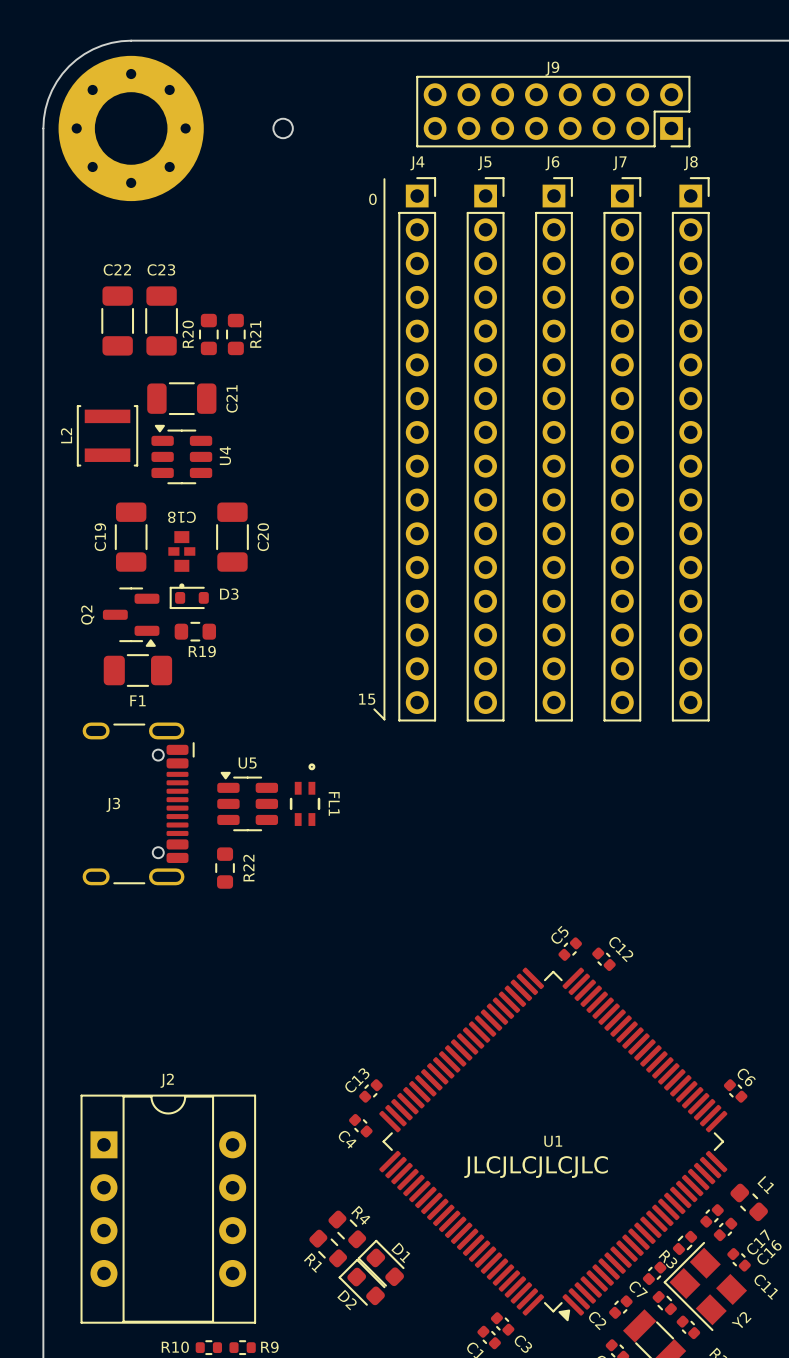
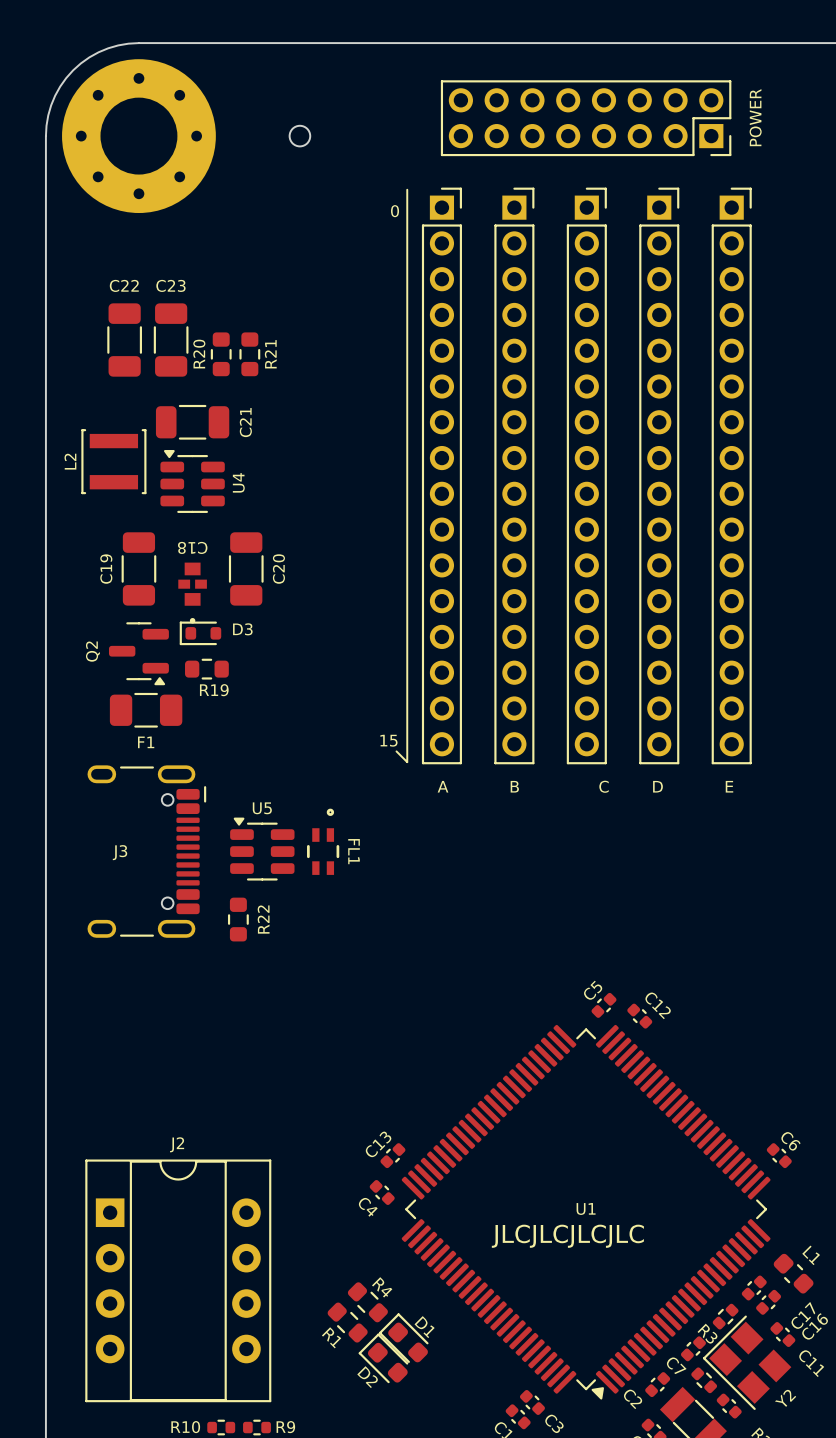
J9 name: J9 (552, 68) -> POWER (755, 117)
J4 name: J4 (417, 163) -> A (443, 786)
J5 name: J5 (484, 163) -> B (514, 786)
J6 name: J6 (552, 163) -> C (604, 786)
J7 name: J7 (619, 163) -> D (657, 786)
J8 name: J8 (690, 163) -> E (729, 786)

